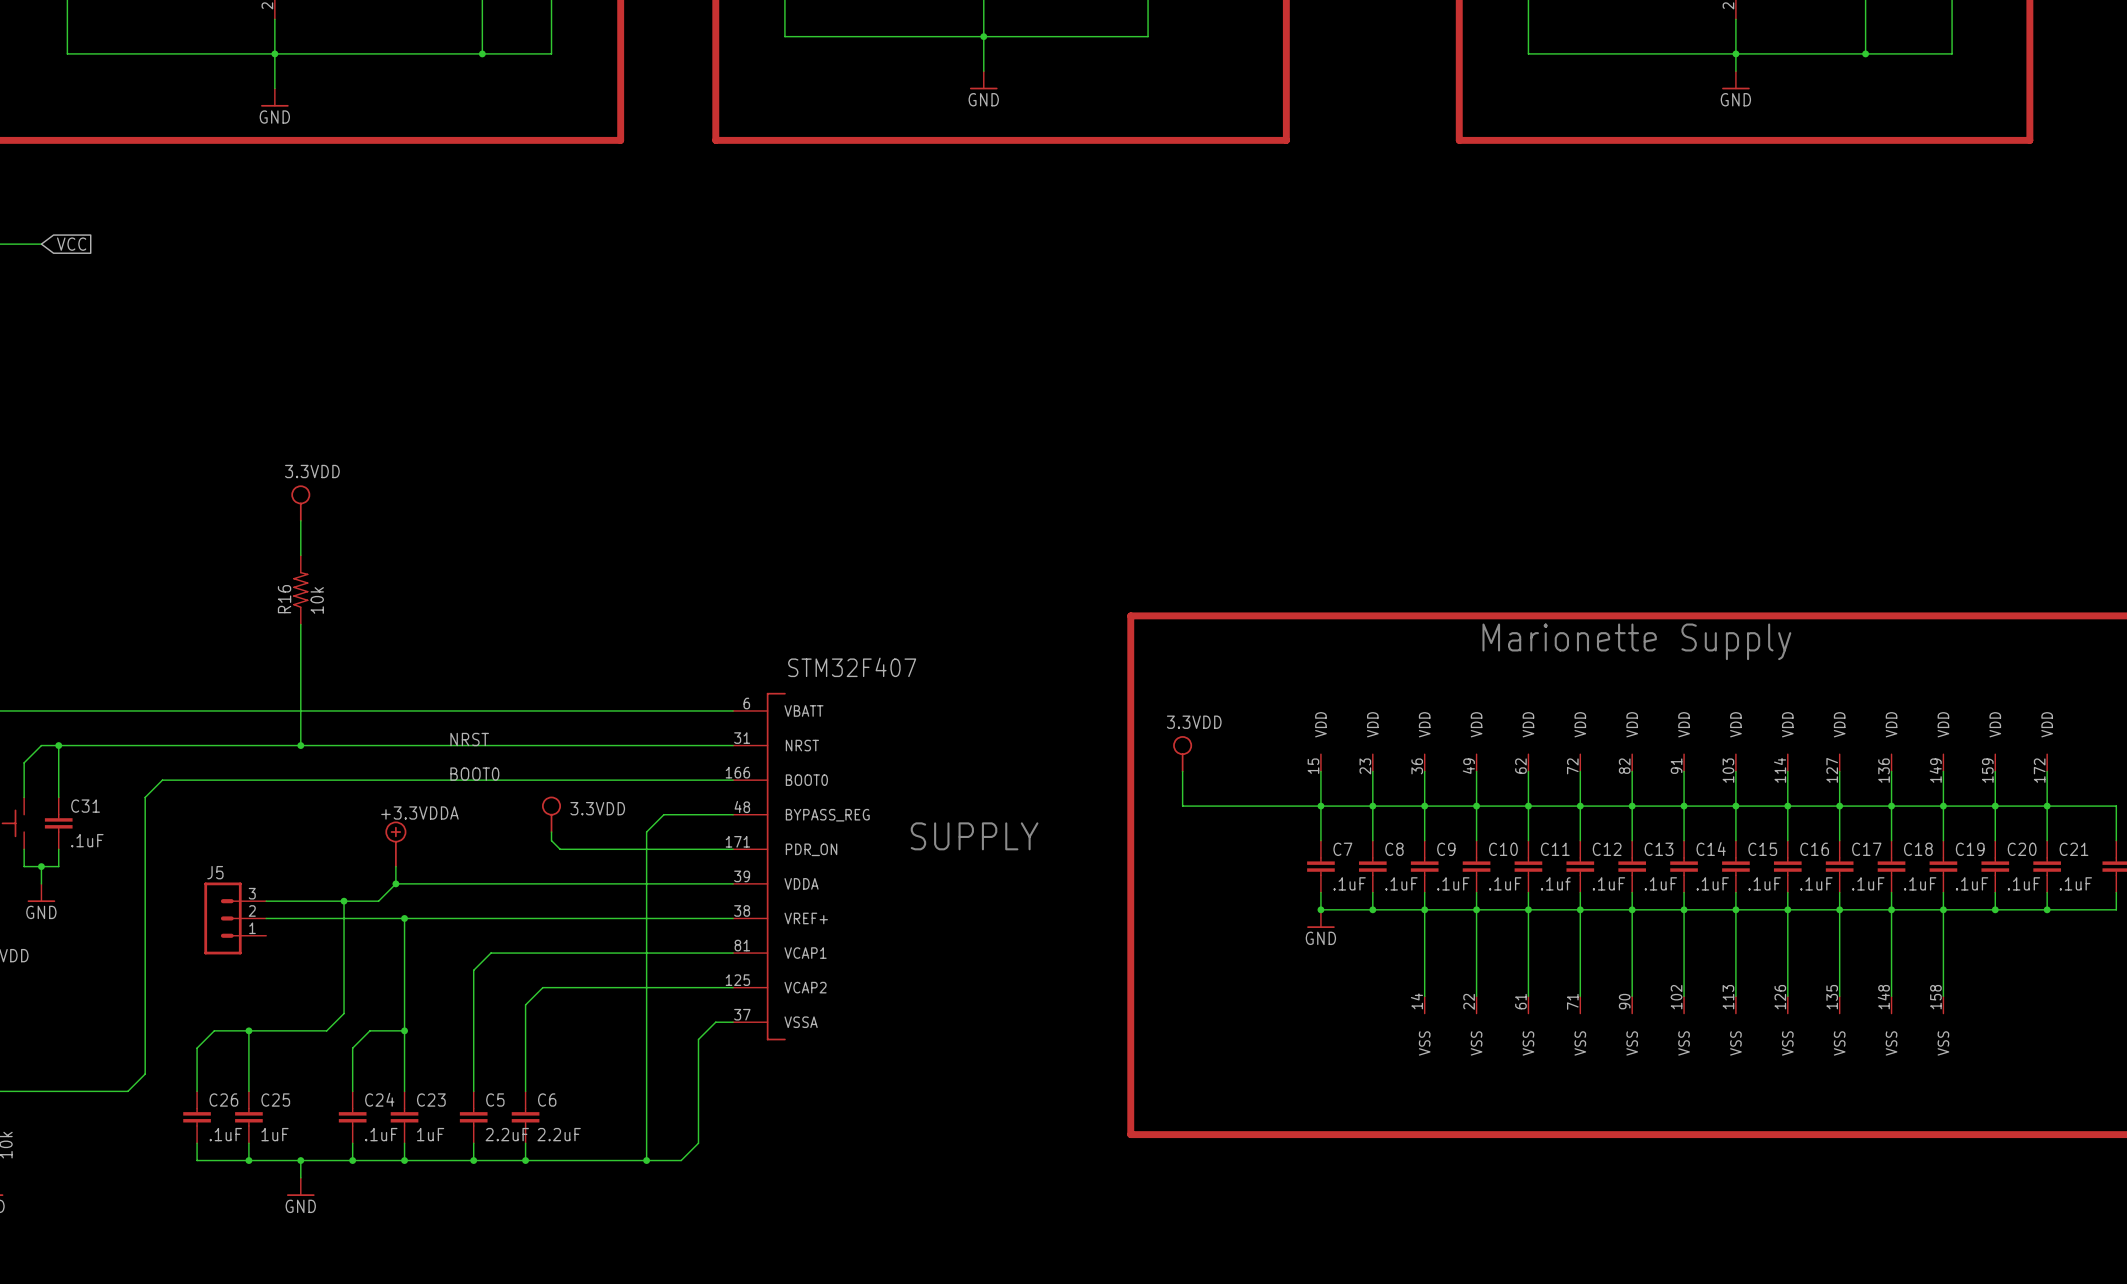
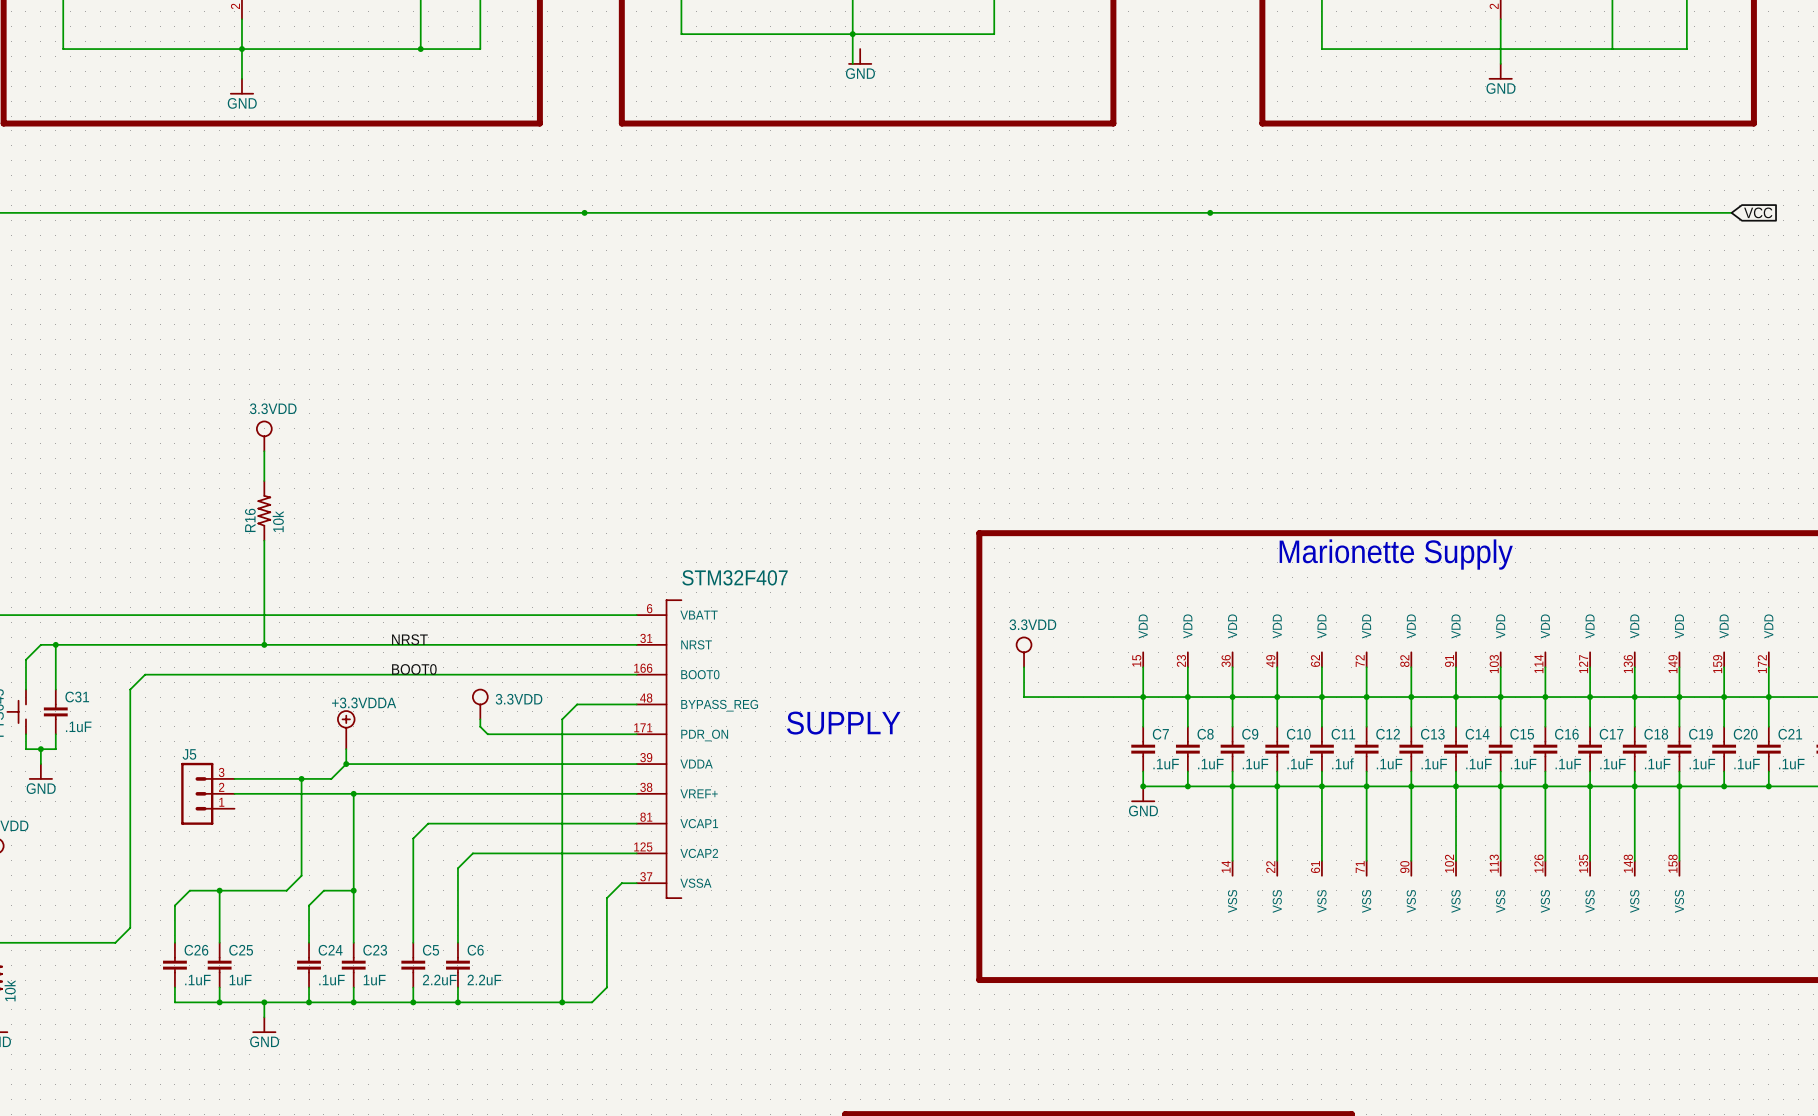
junction: (1735, 53) -> none
junction: (1865, 53) -> none
power symbol position: GND (983, 80) -> GND (860, 56)
wire: none -> (40, 212) (1731, 212)
global label: VCC (71, 244) -> none
junction: none -> (584, 212)
junction: none -> (1210, 212)
global label: none -> VCC (1758, 212)

